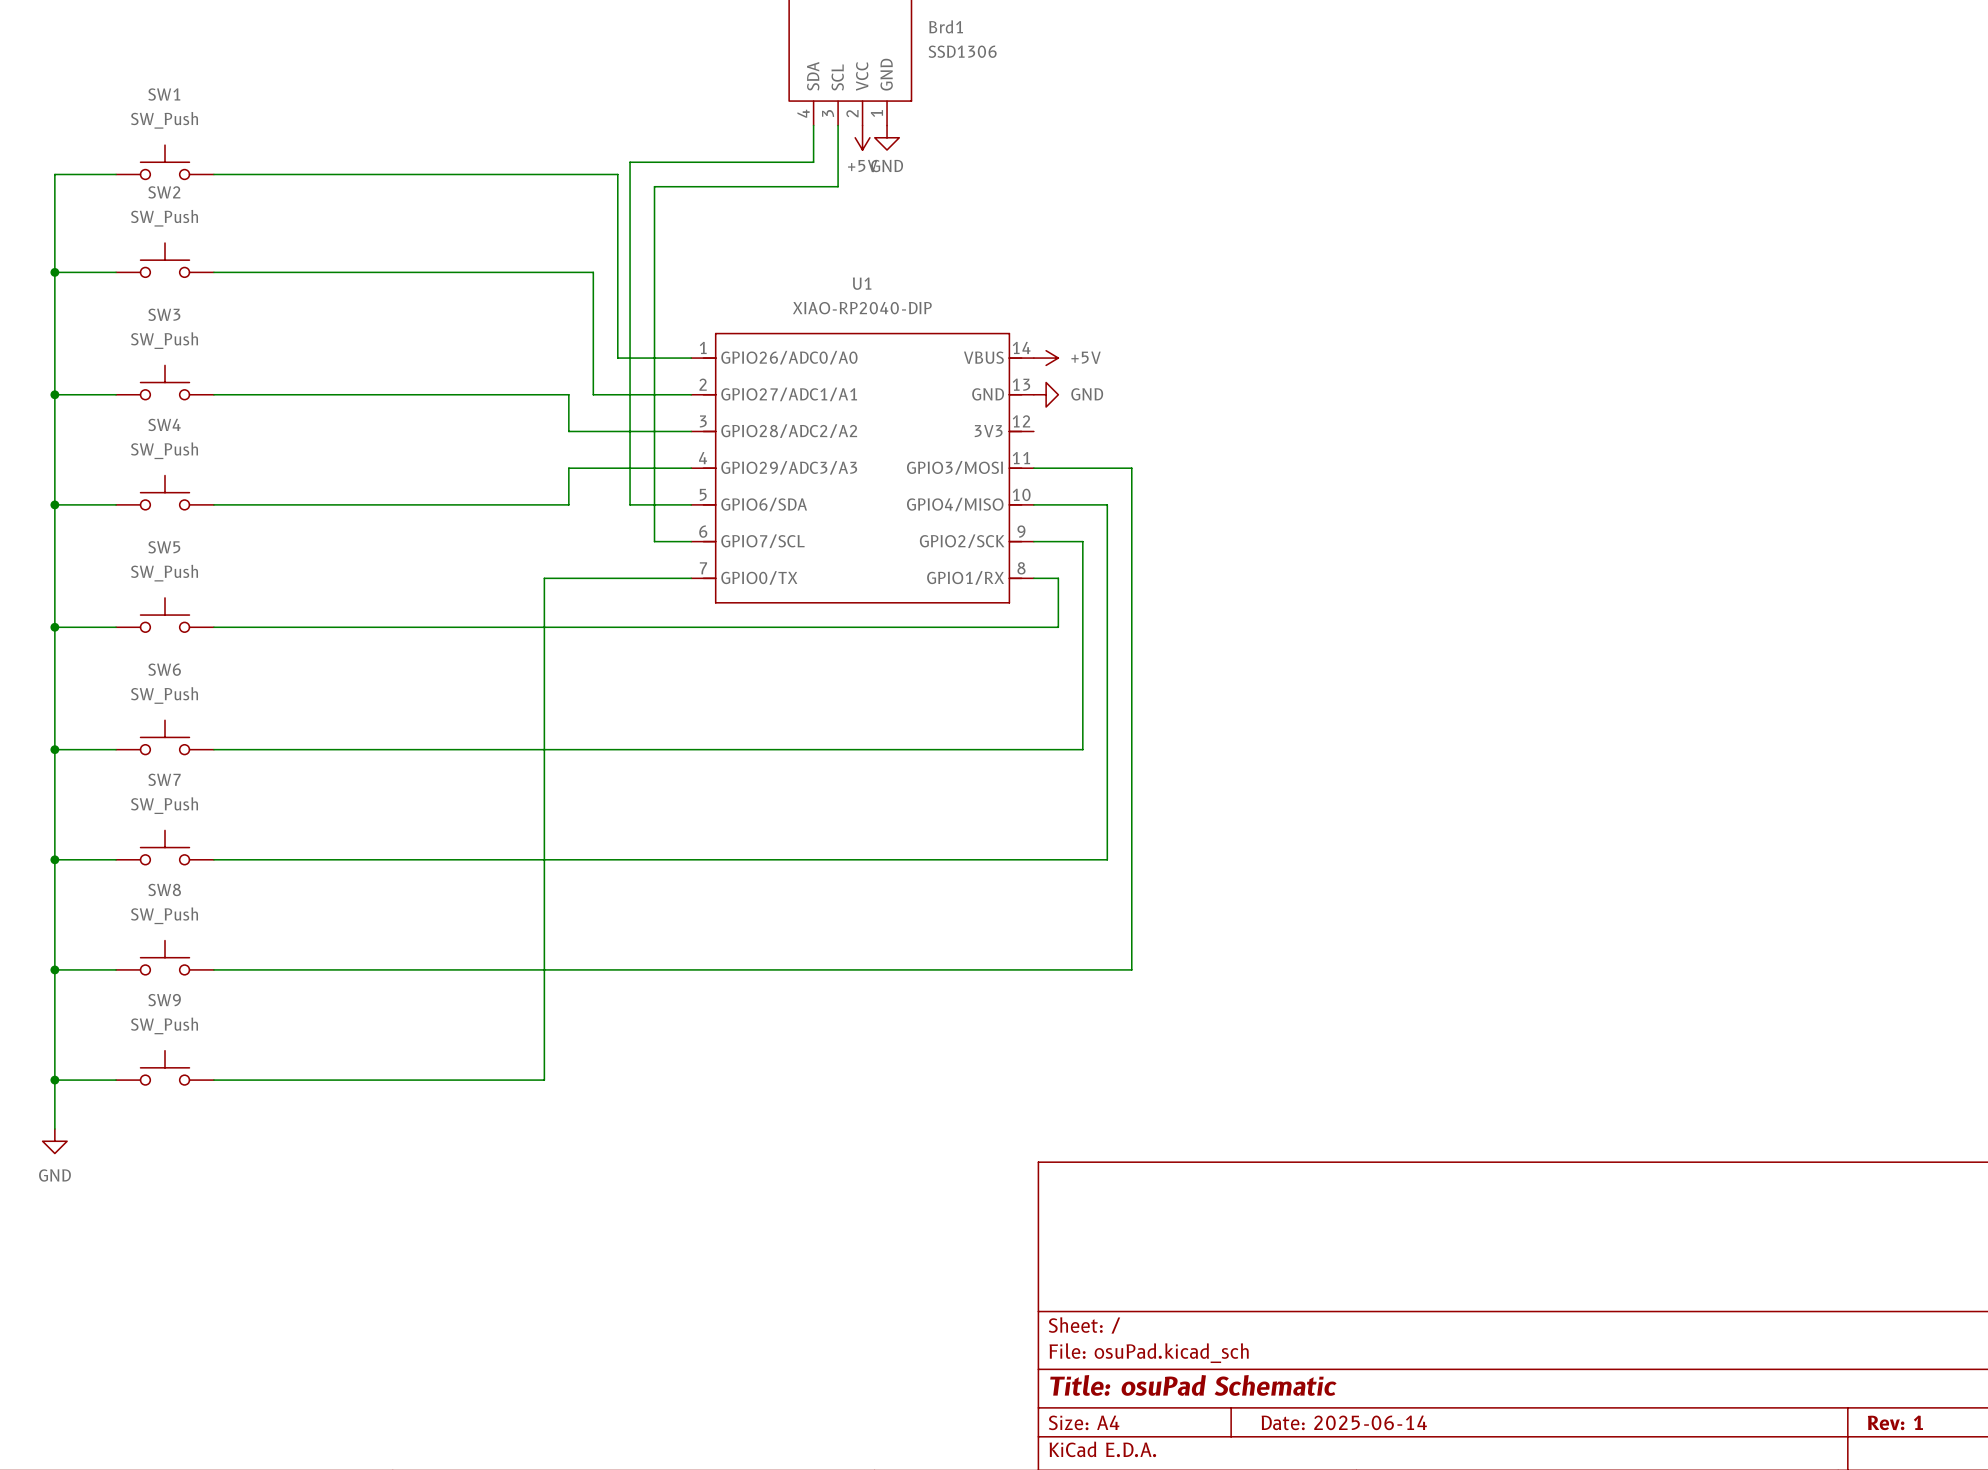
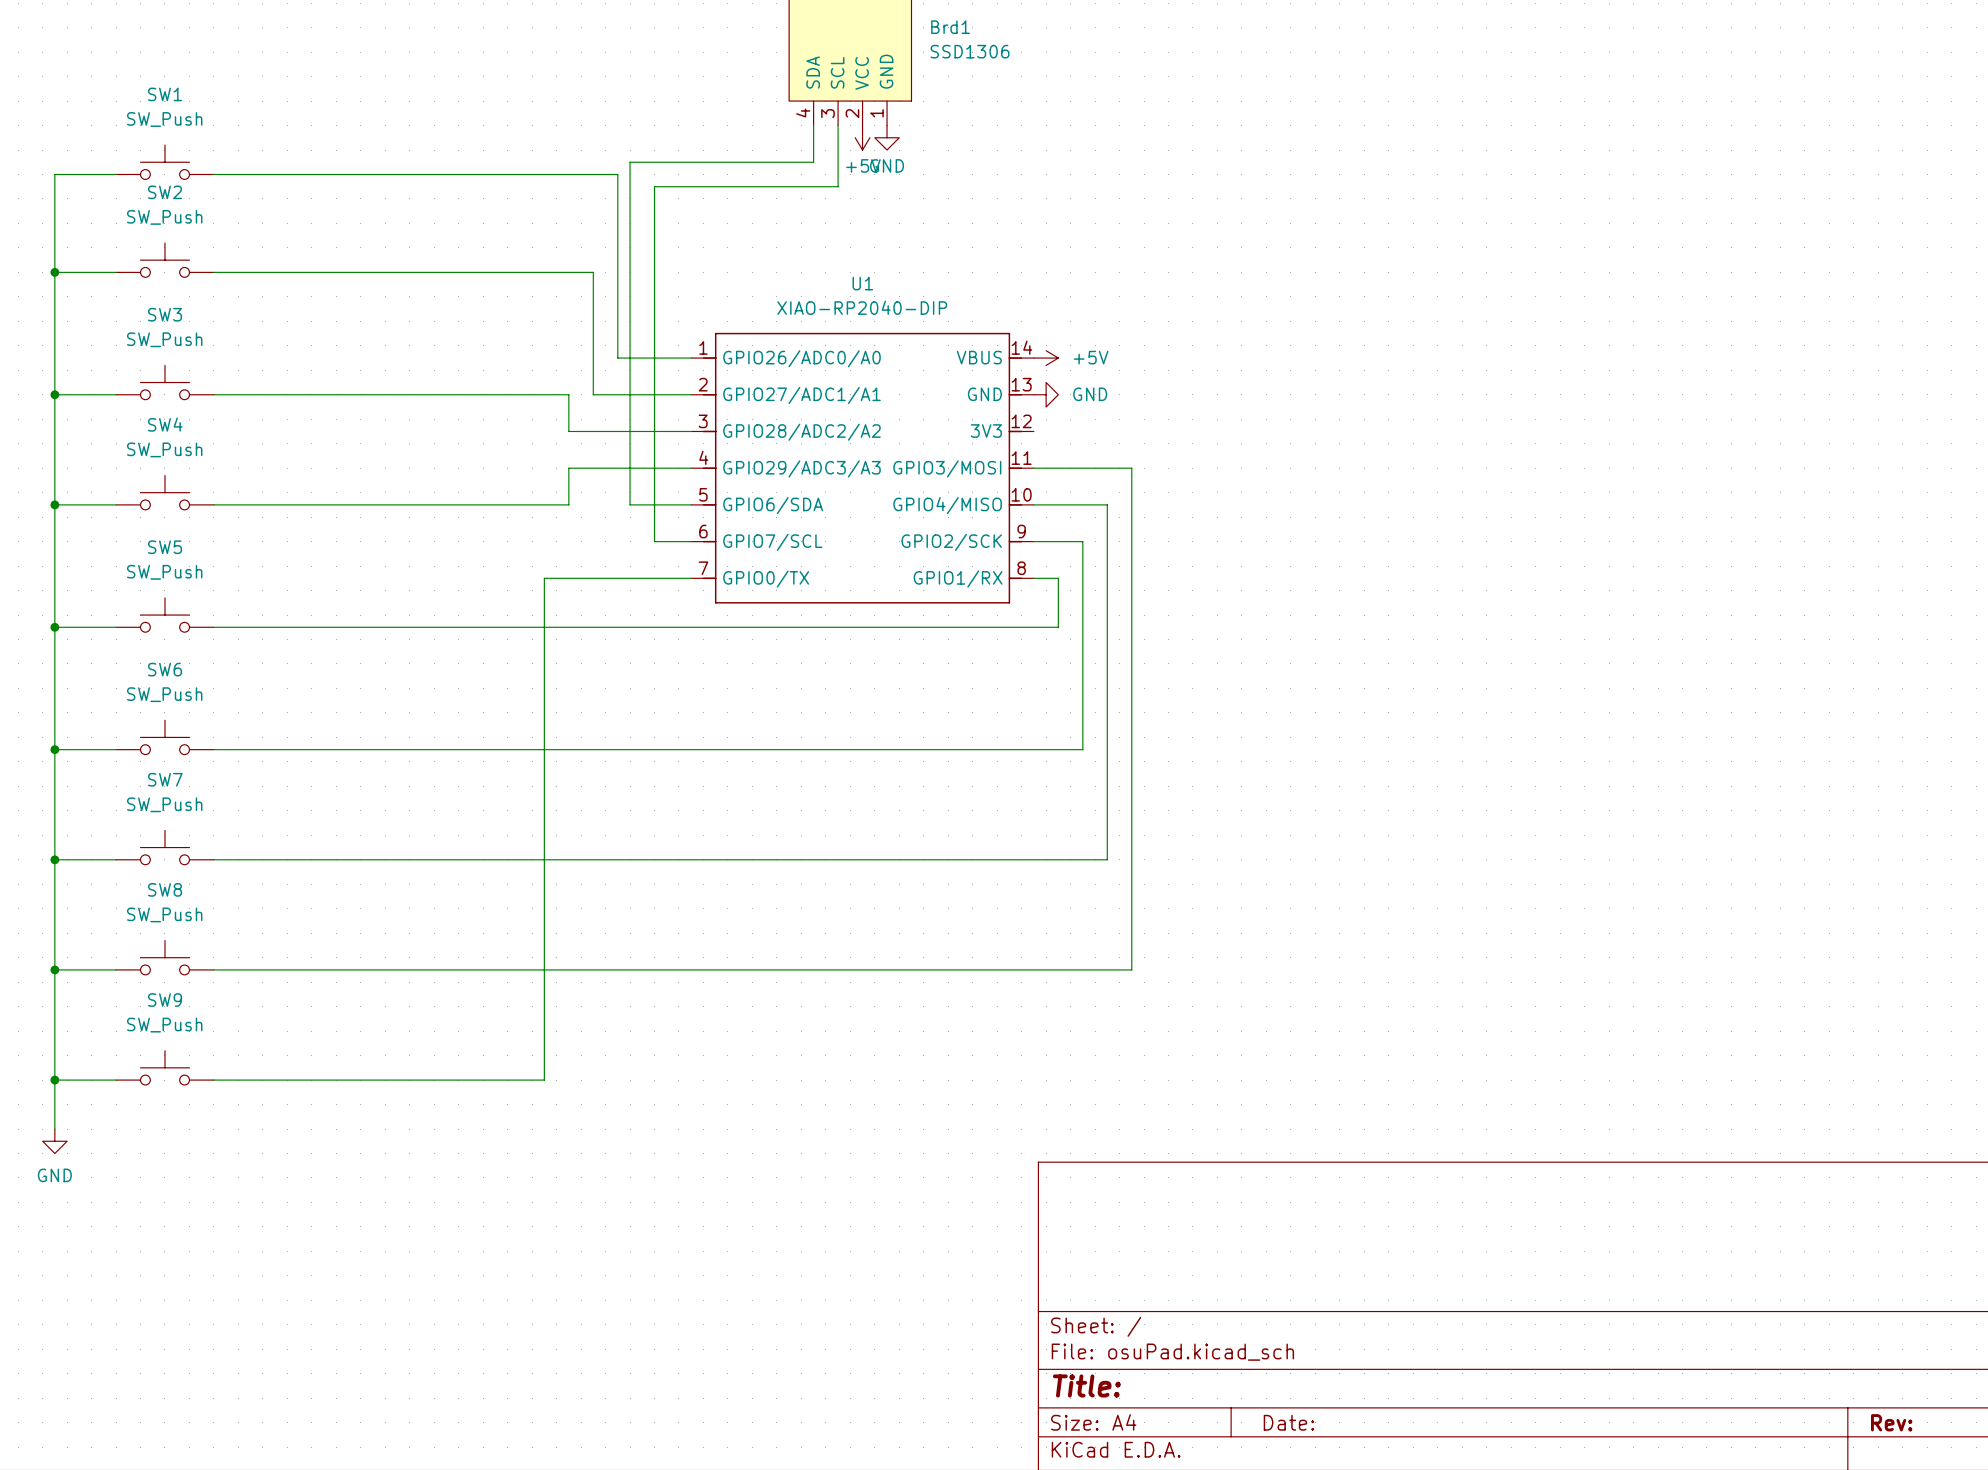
title block: Title: osuPad Schematic (1193, 1385) -> Title: (1086, 1385)
title block: Date: 2025-06-14 (1344, 1422) -> Date: (1288, 1422)
title block: Rev: 1 (1895, 1422) -> Rev: (1891, 1422)

